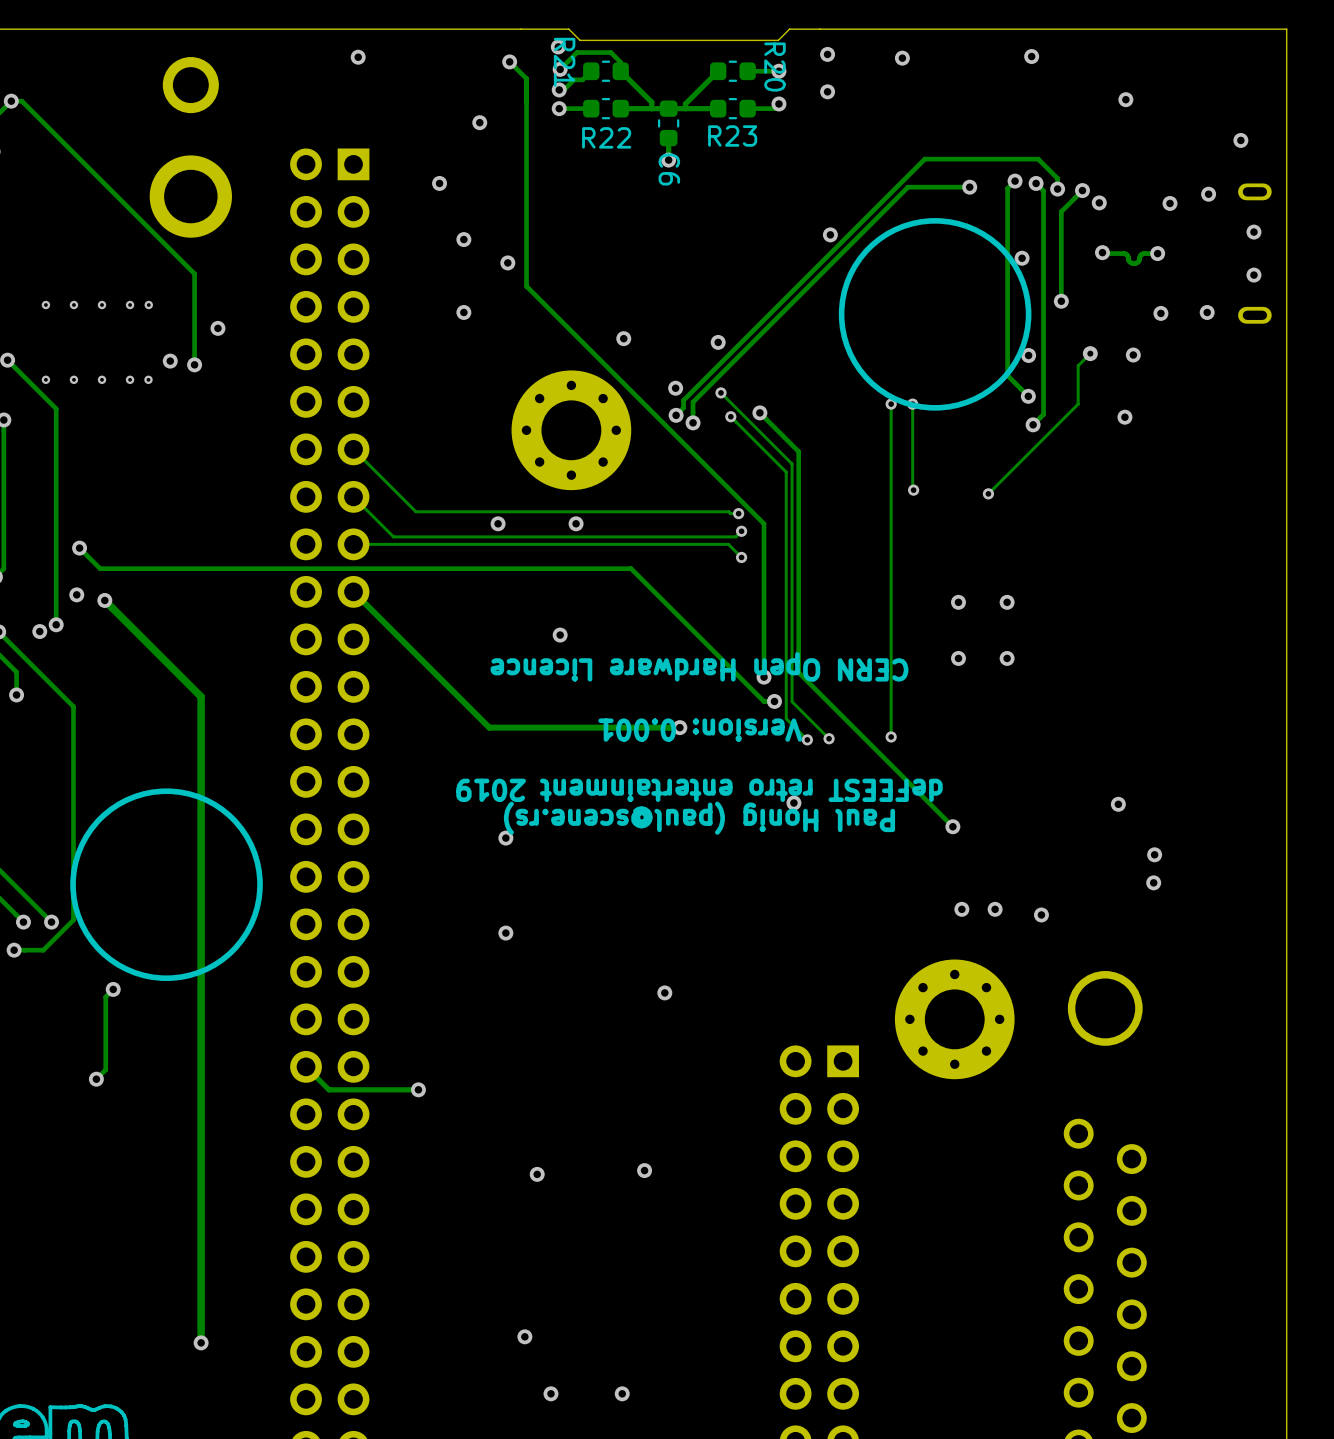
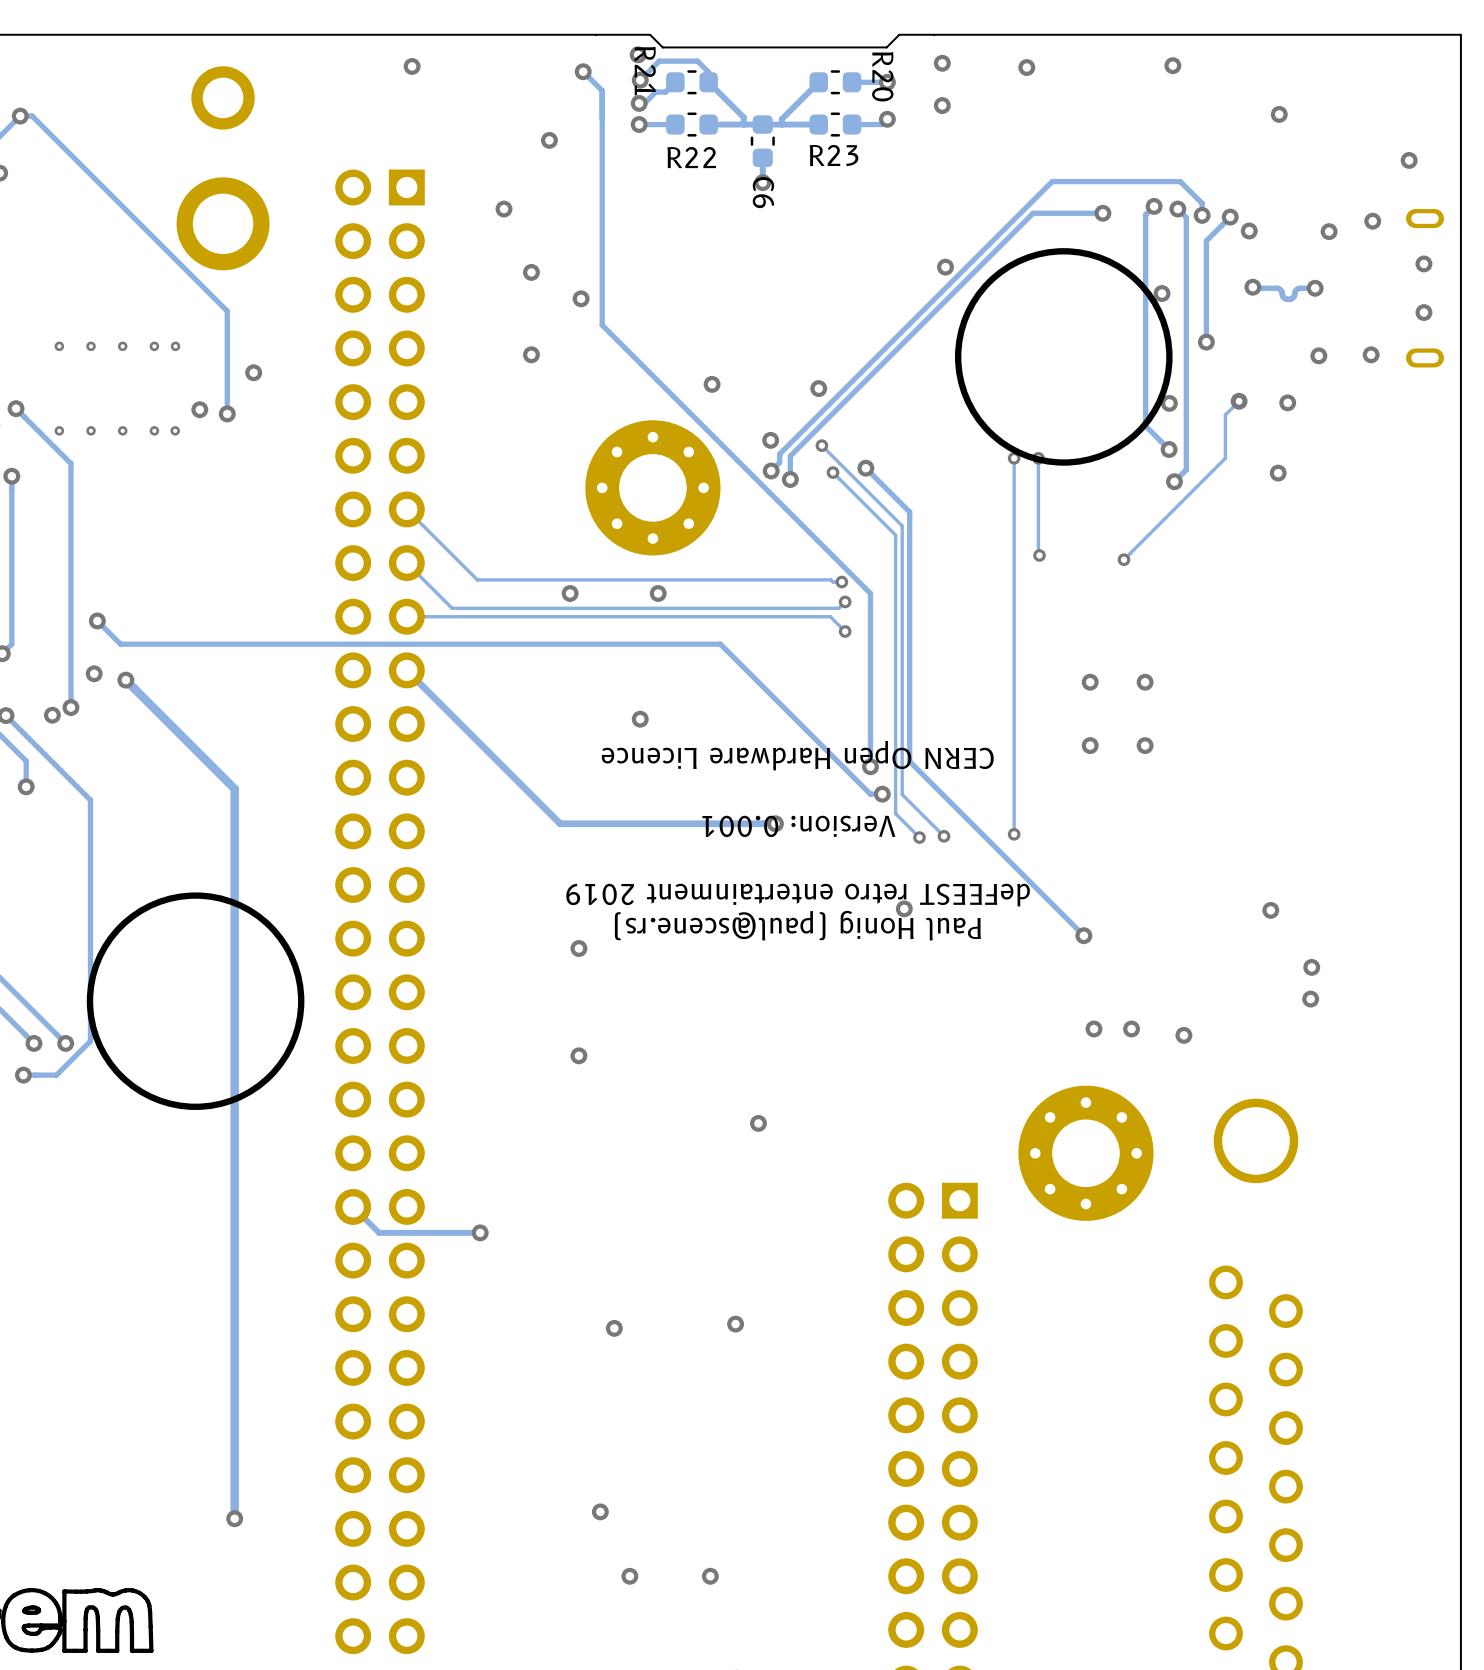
track: (113, 989) (105, 996) (105, 1069) (96, 1079) -> none
via: (113, 989) -> none
via: (96, 1079) -> none

